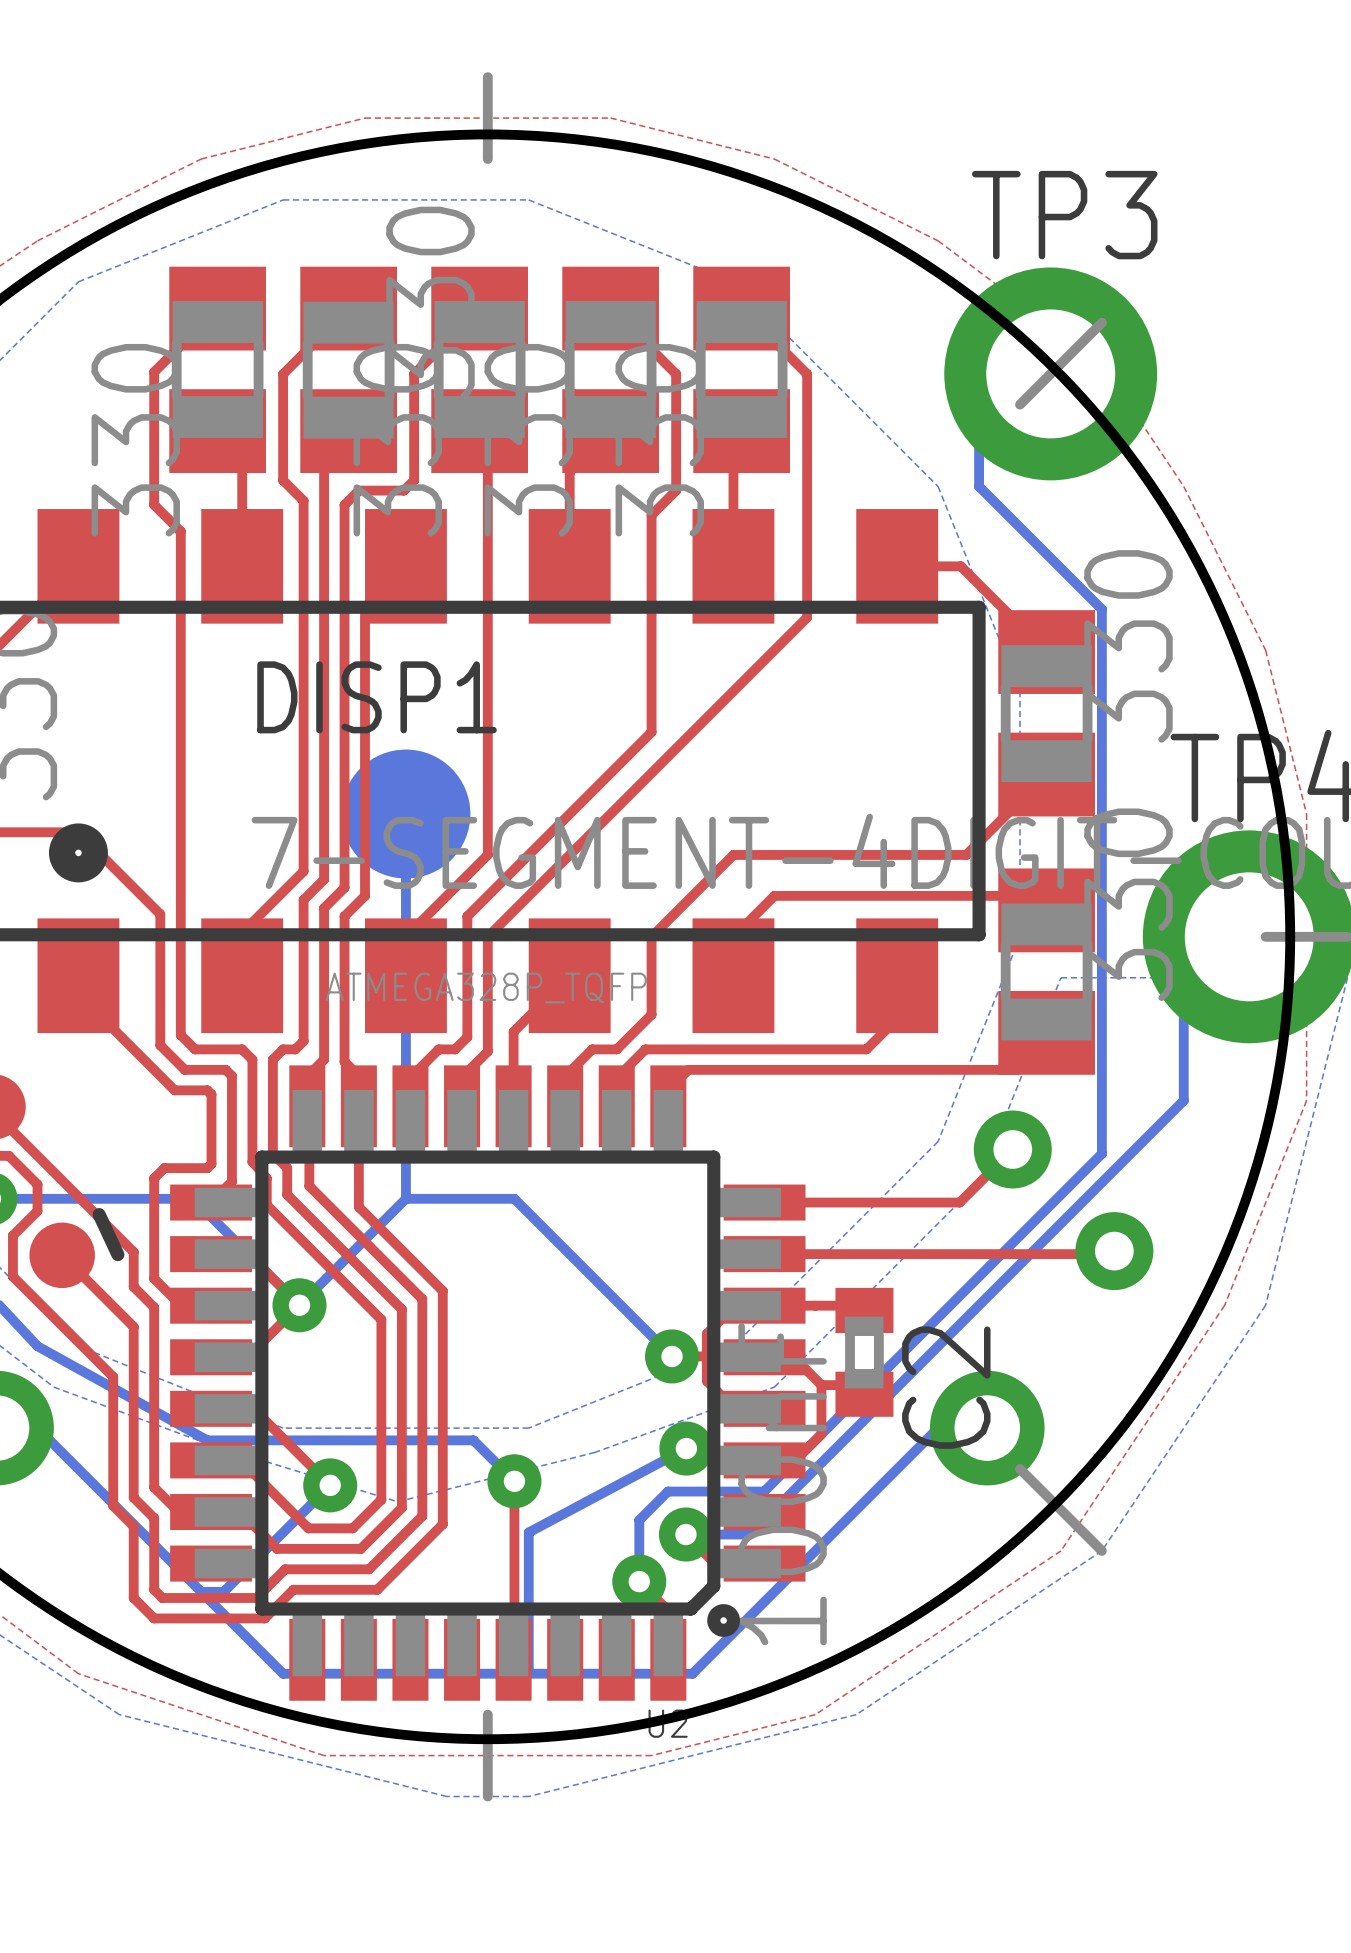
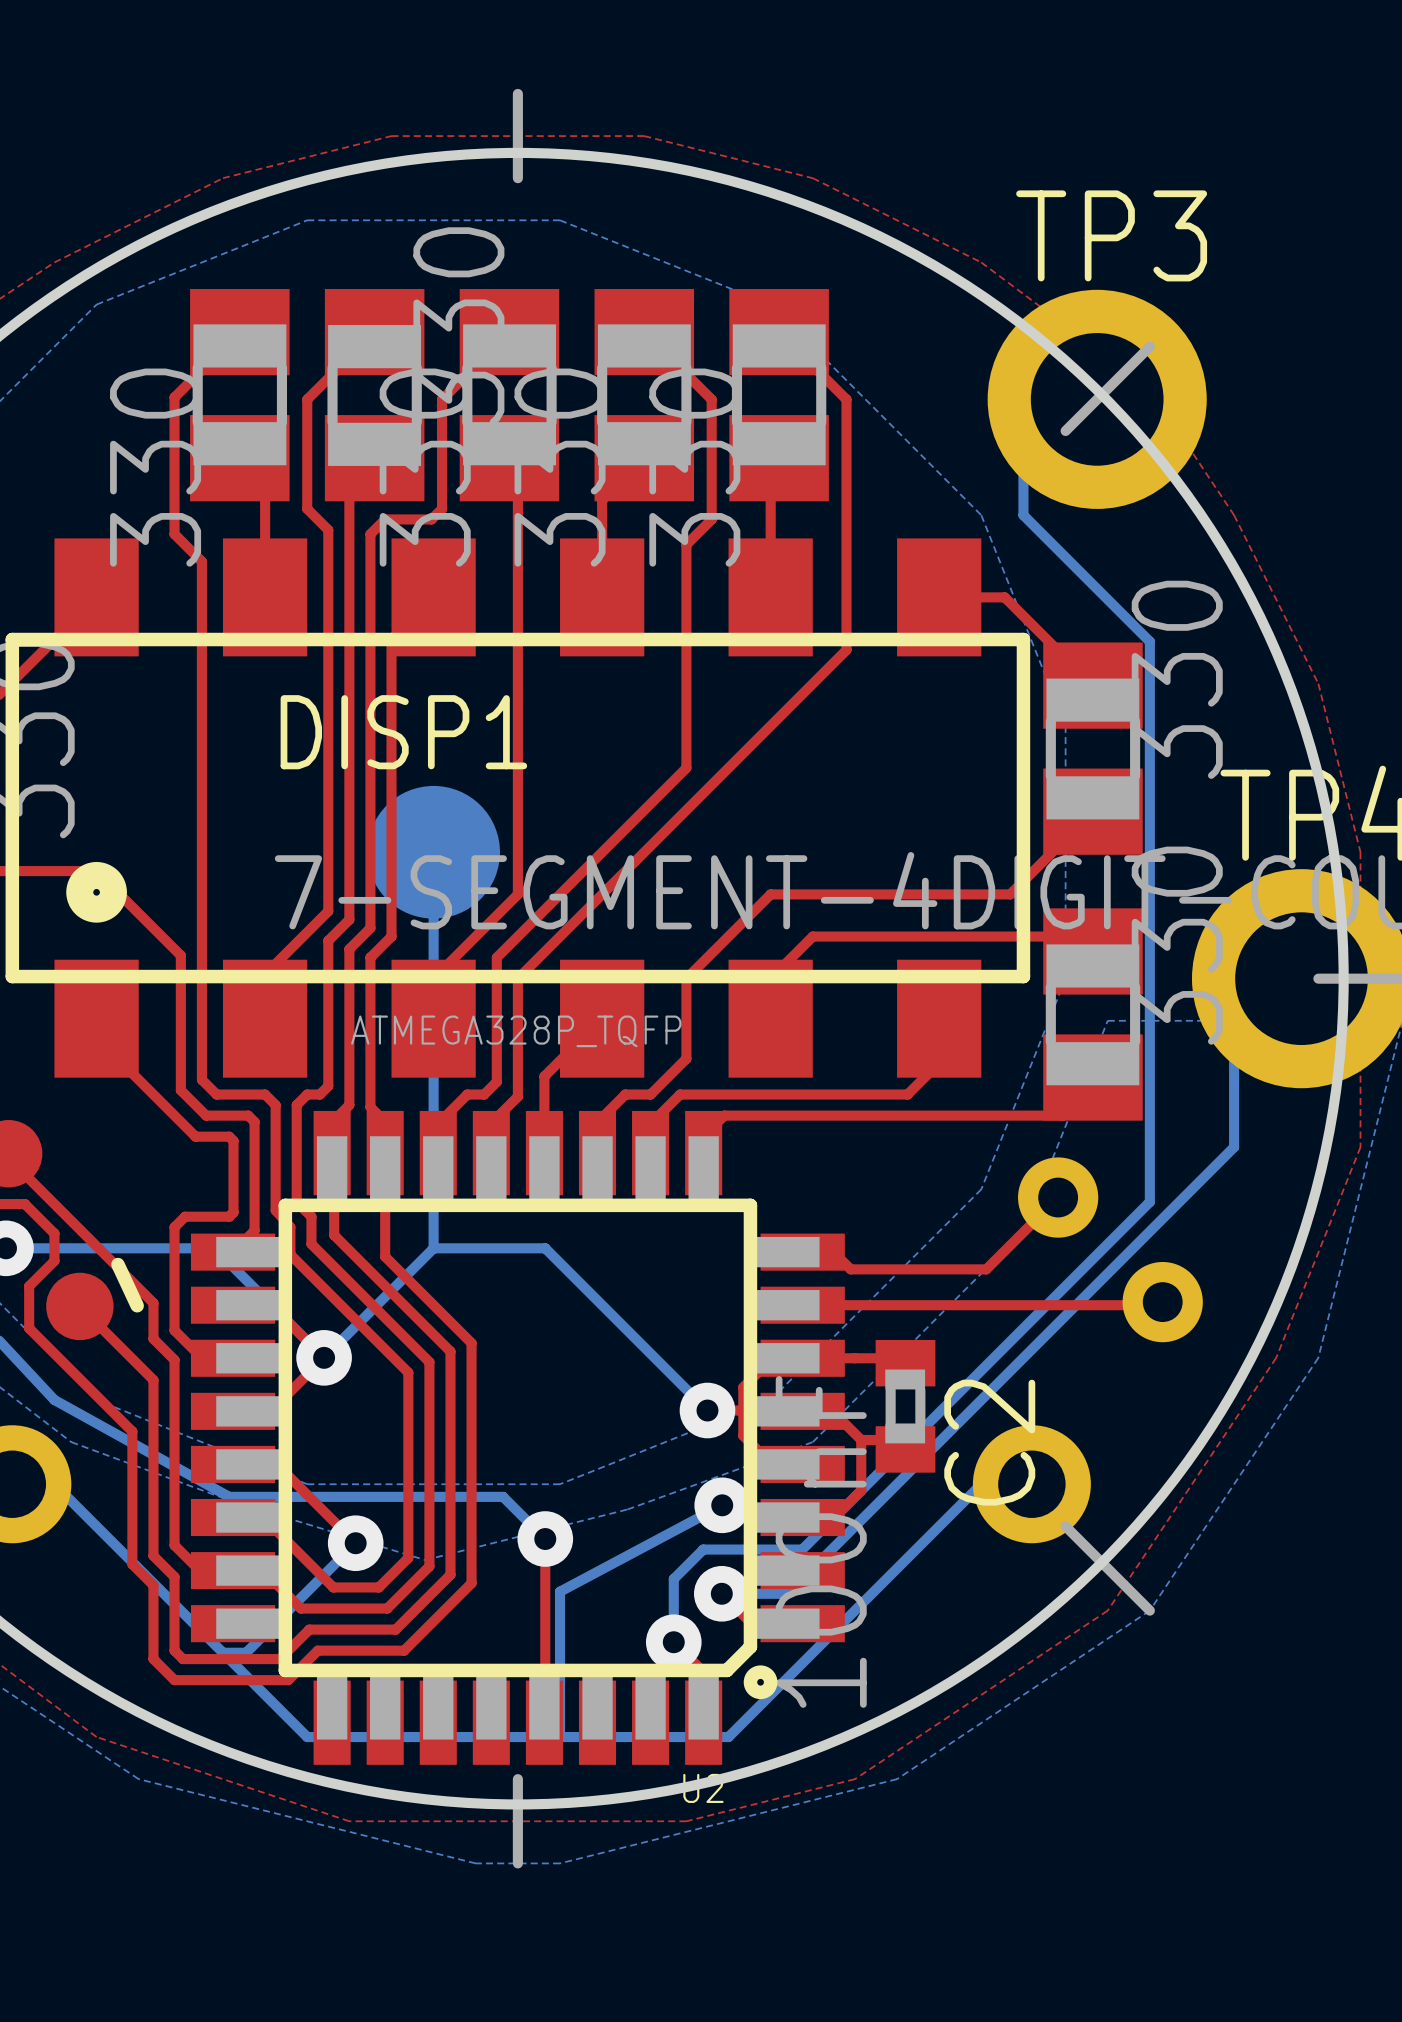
top track: (794, 1202) (959, 1202) -> (833, 1252) (850, 1269) (986, 1269) (1003, 1252)

